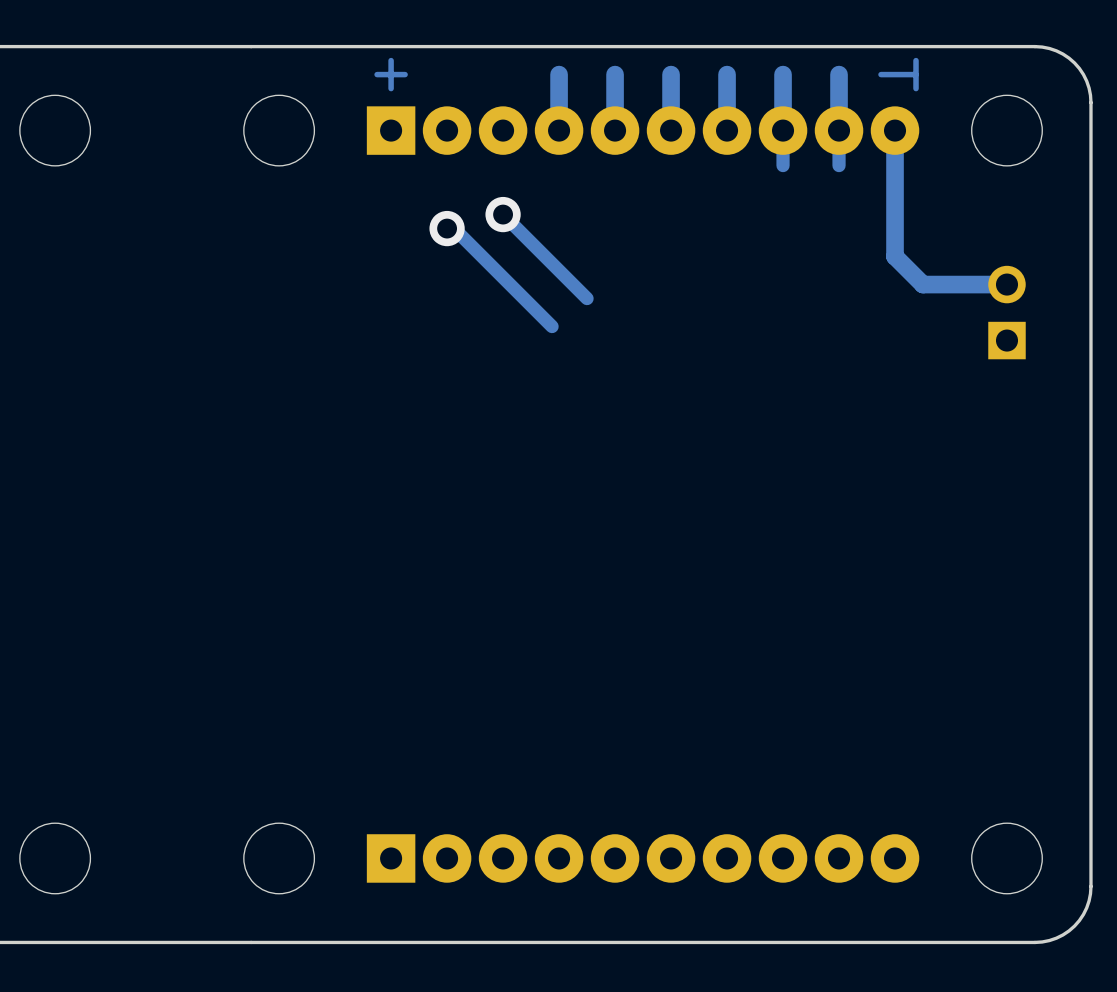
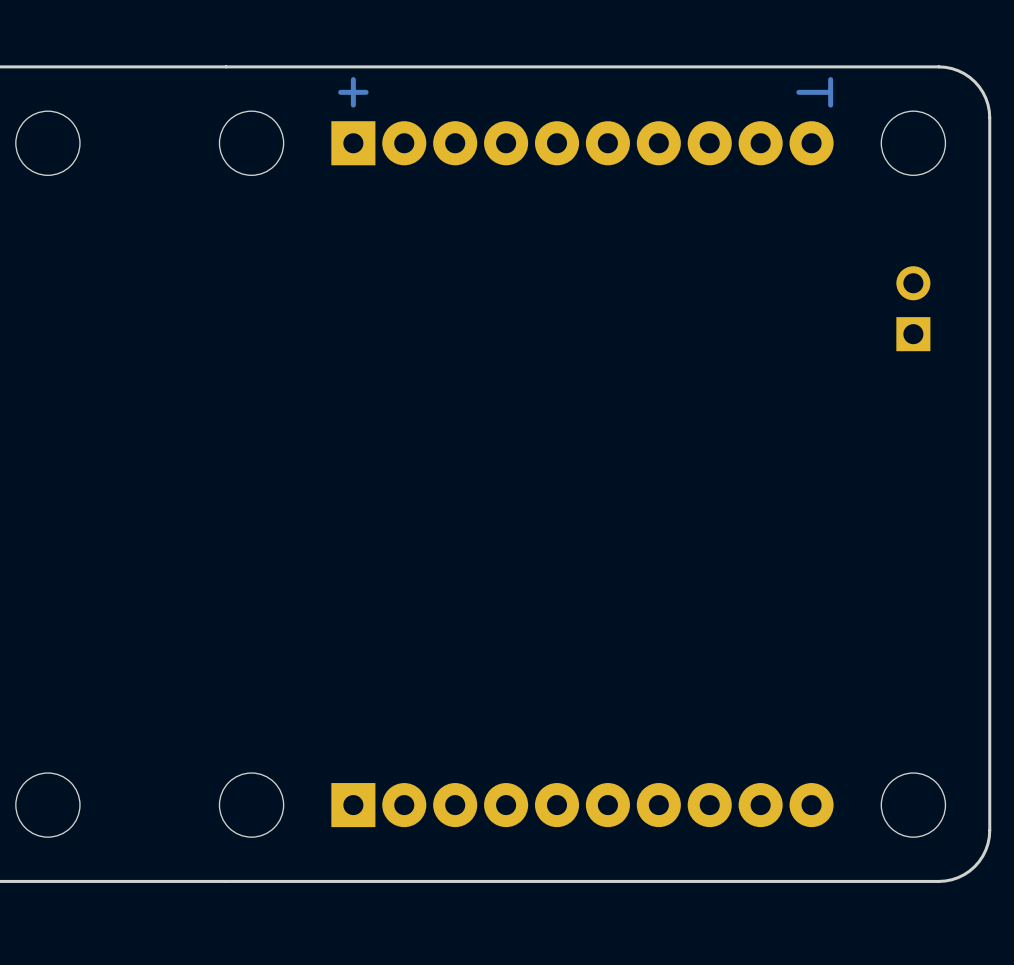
track: (559, 74) (559, 130) -> none
track: (615, 74) (615, 130) -> none
track: (671, 74) (671, 130) -> none
track: (727, 74) (727, 130) -> none
track: (783, 74) (783, 165) -> none
track: (839, 74) (839, 165) -> none
track: (895, 130) (895, 256) (923, 284) (1006, 284) -> none
track: (503, 214) (587, 298) -> none
via: (503, 214) -> none
track: (447, 221) (552, 326) -> none
via: (447, 228) -> none

